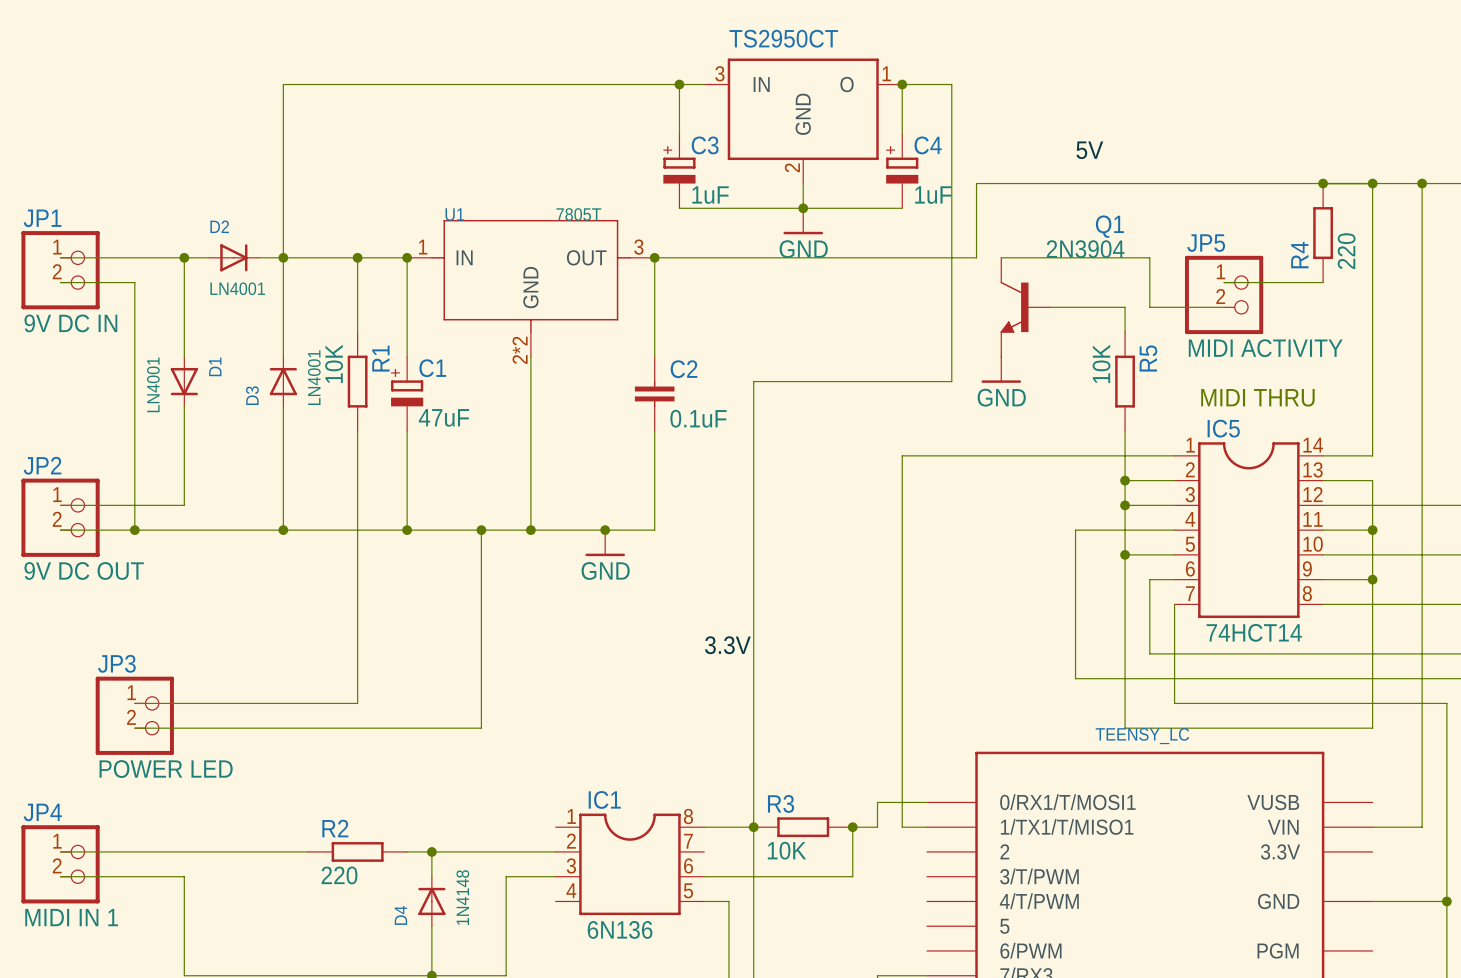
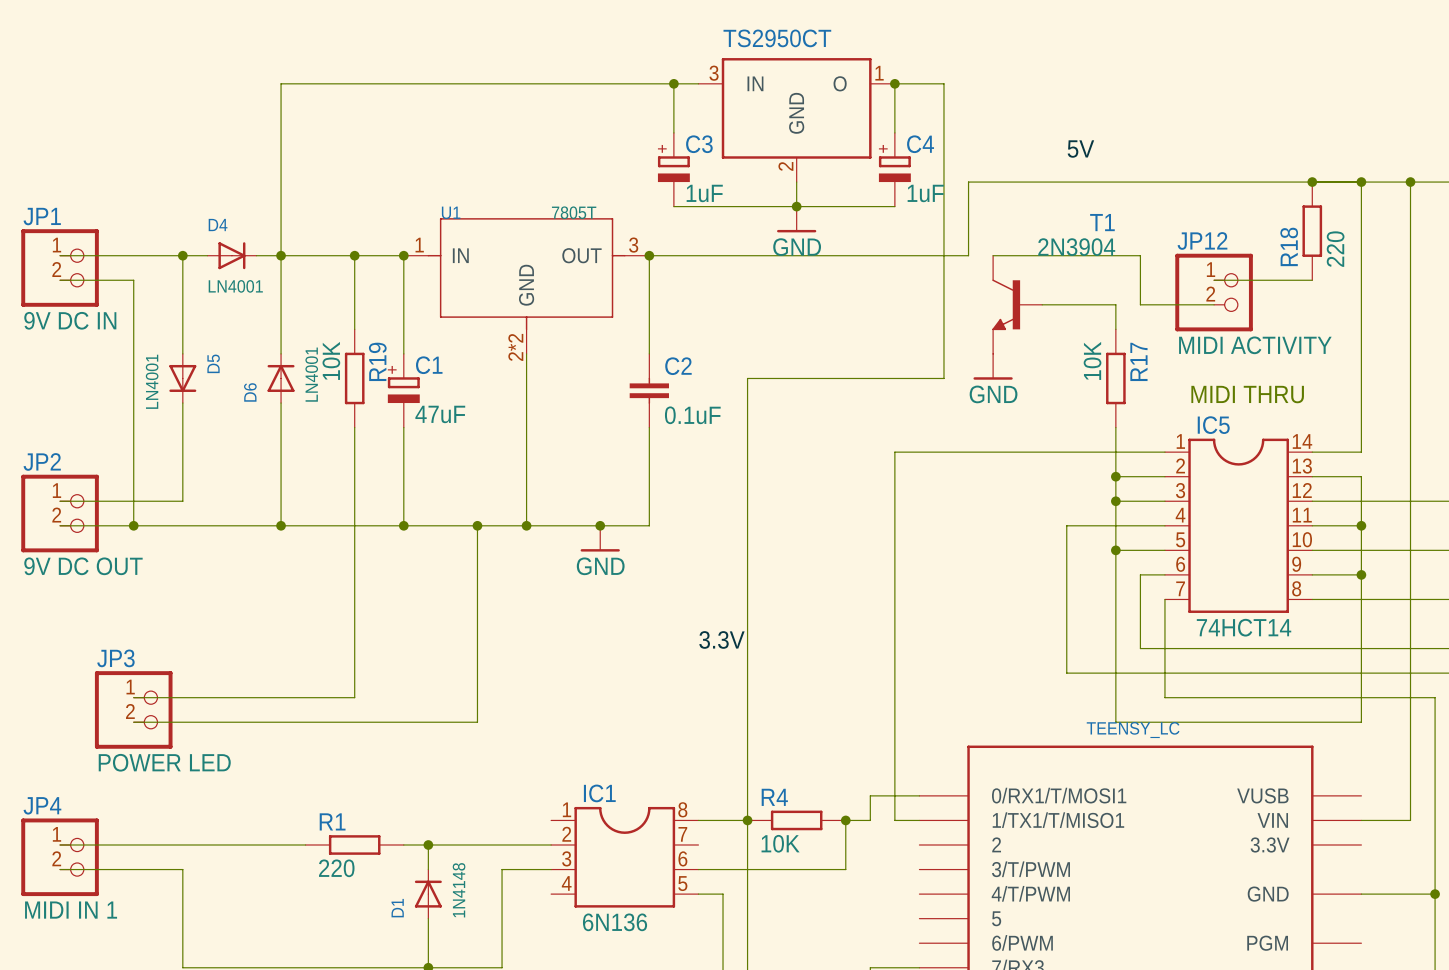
D2 name: D2 (219, 226) -> D4 (218, 225)
Q1 name: Q1 (1109, 226) -> T1 (1102, 222)
JP5 name: JP5 (1206, 243) -> JP12 (1202, 240)
R4 name: R4 (1299, 255) -> R18 (1289, 246)
R1 name: R1 (380, 358) -> R19 (377, 361)
R5 name: R5 (1148, 358) -> R17 (1138, 361)
D1 name: D1 (215, 366) -> D5 (213, 363)
D3 name: D3 (252, 395) -> D6 (250, 392)
R3 name: R3 (781, 803) -> R4 (774, 797)
R2 name: R2 (335, 828) -> R1 (332, 821)
D4 name: D4 (400, 915) -> D1 (397, 908)

